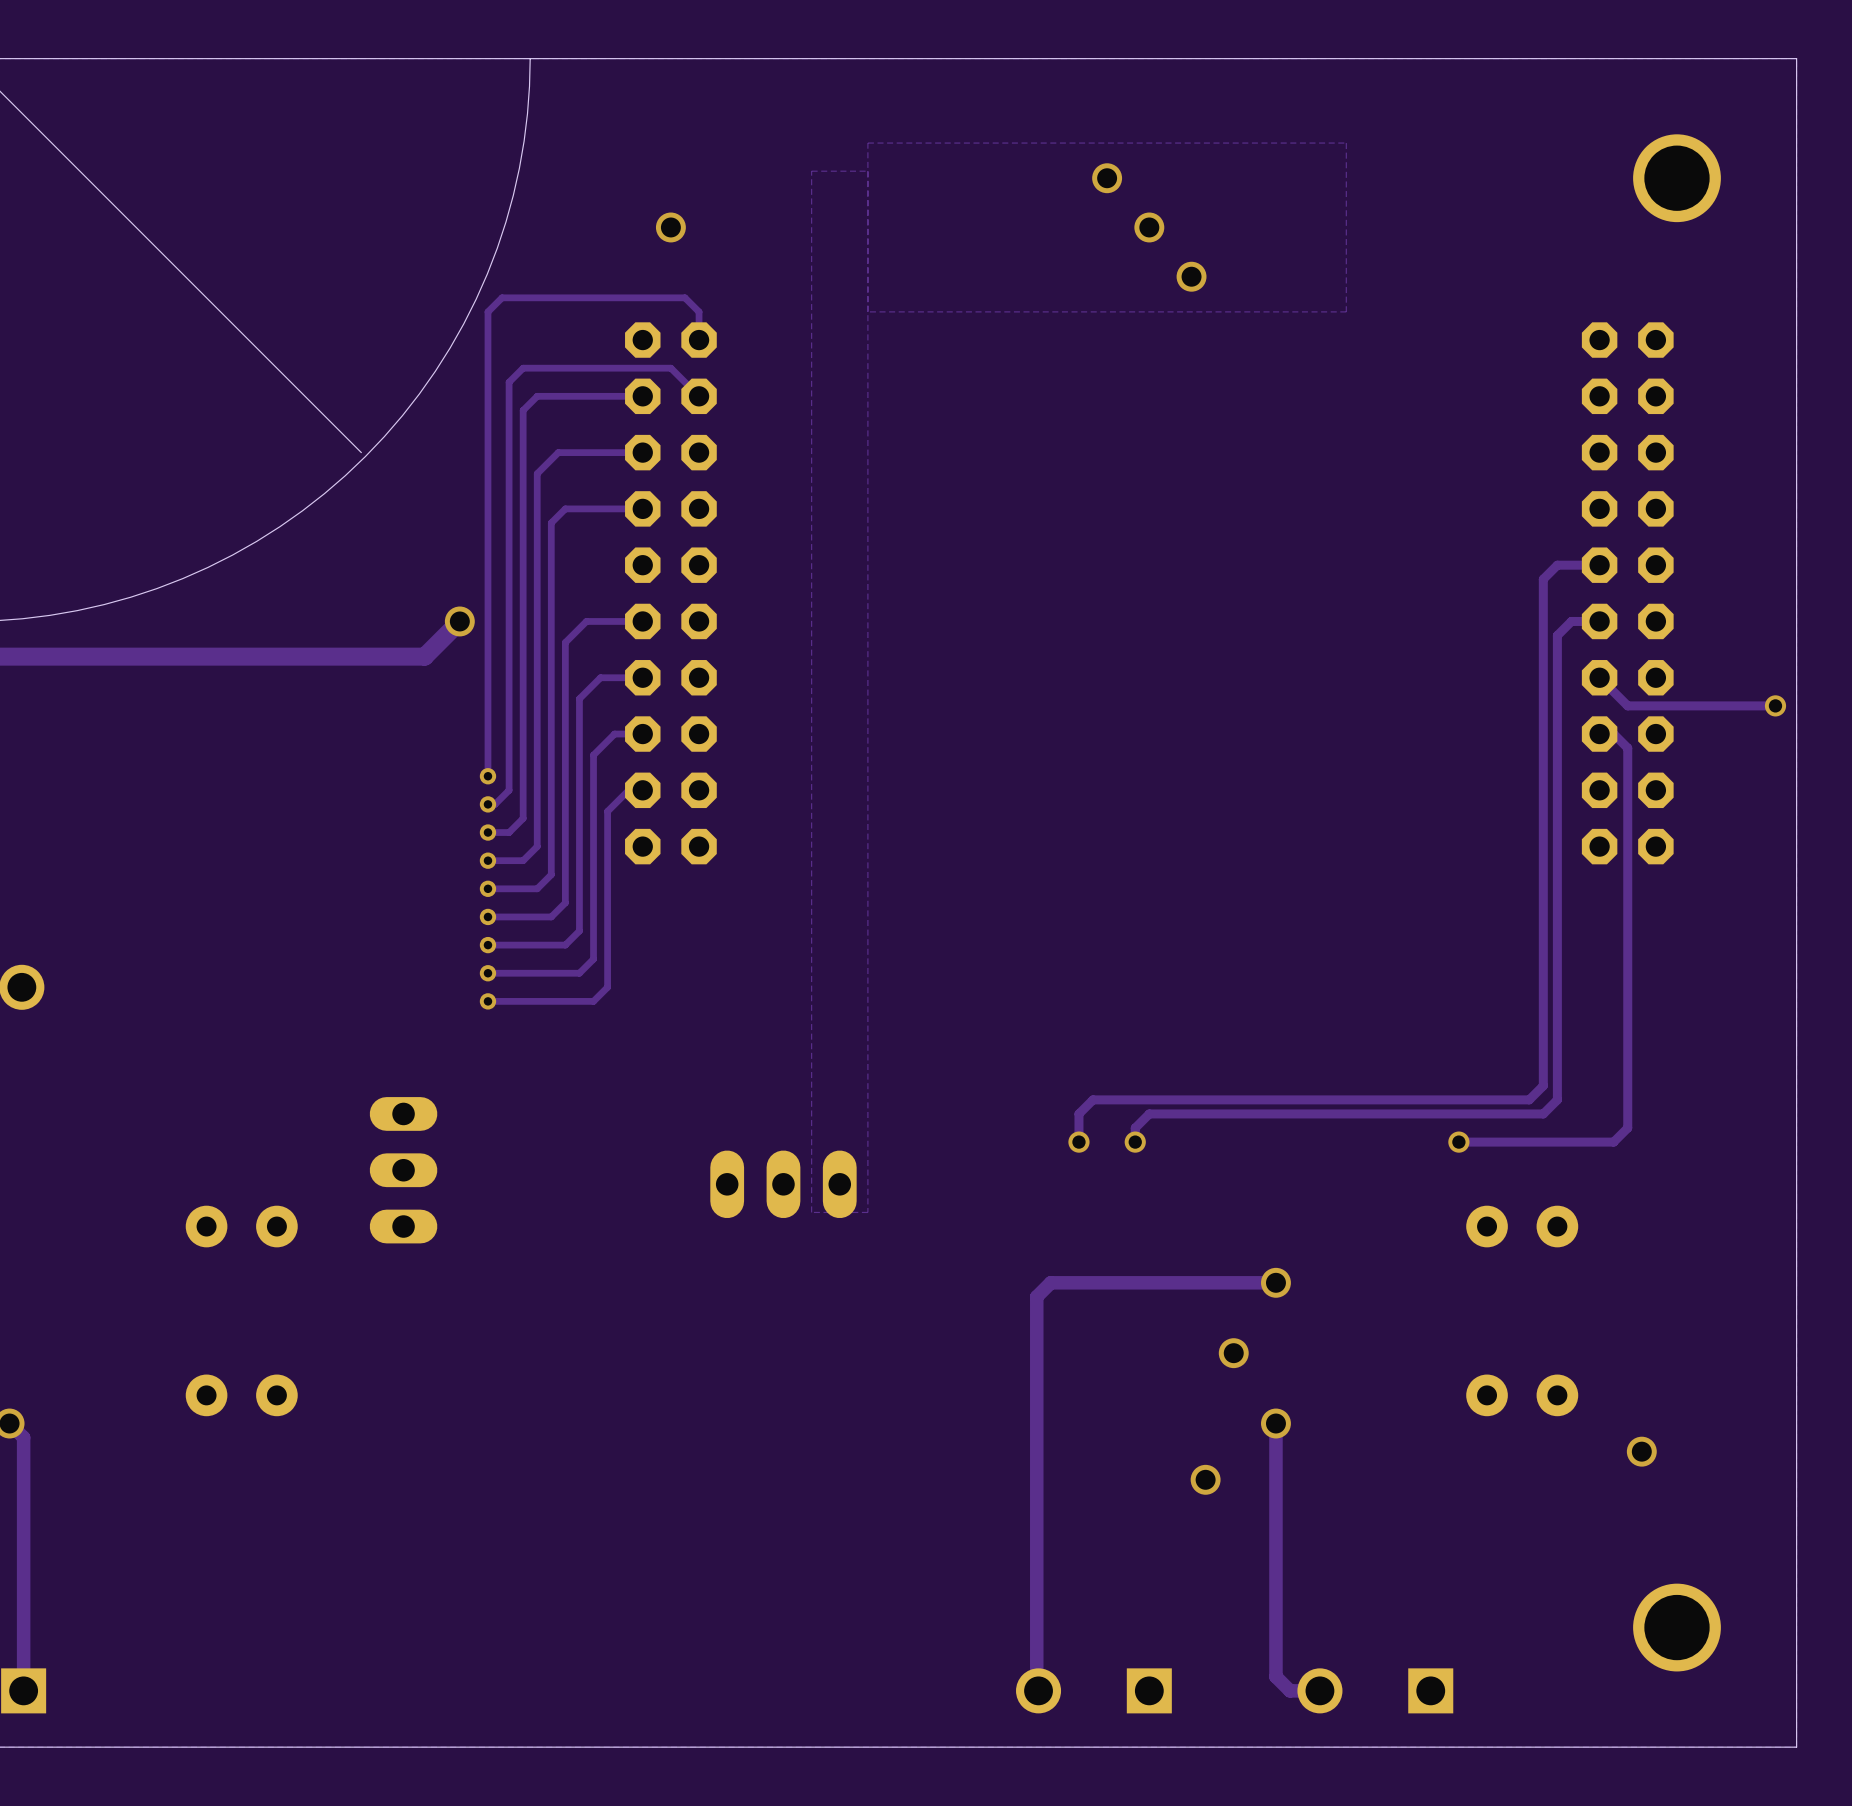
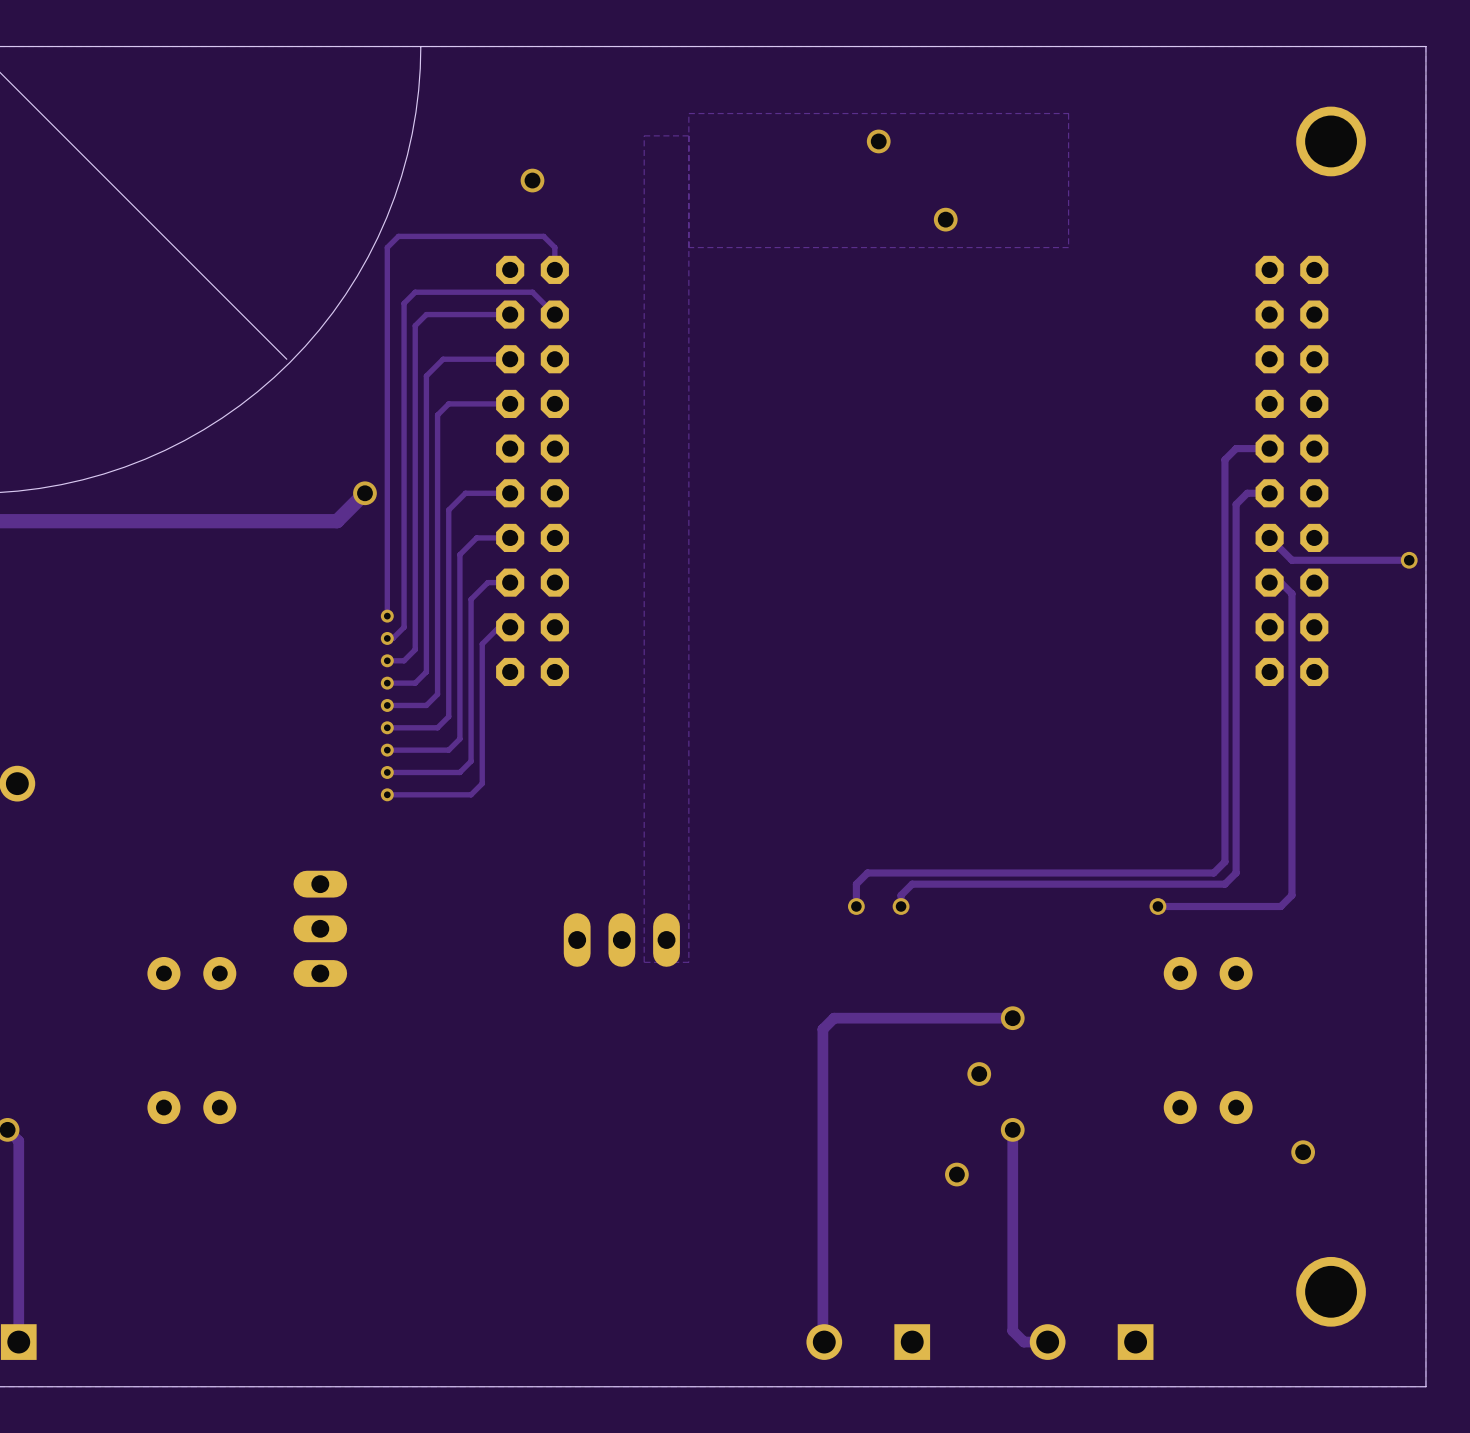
via: (1149, 227) -> none

